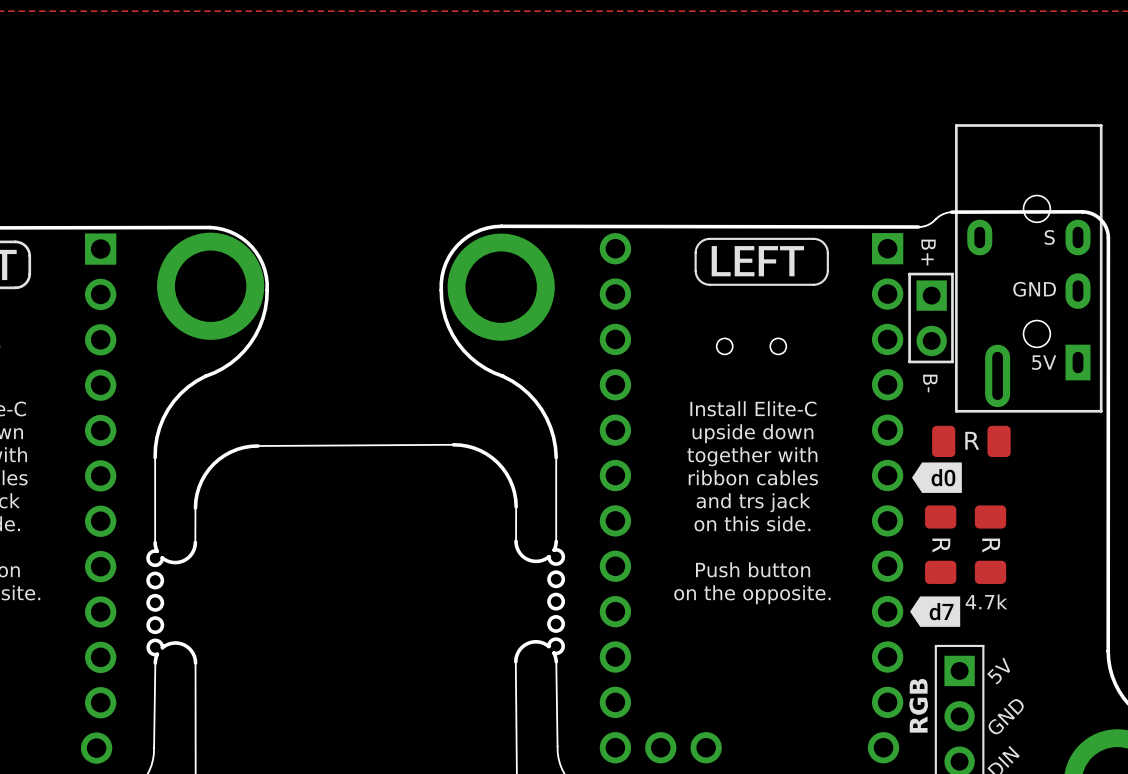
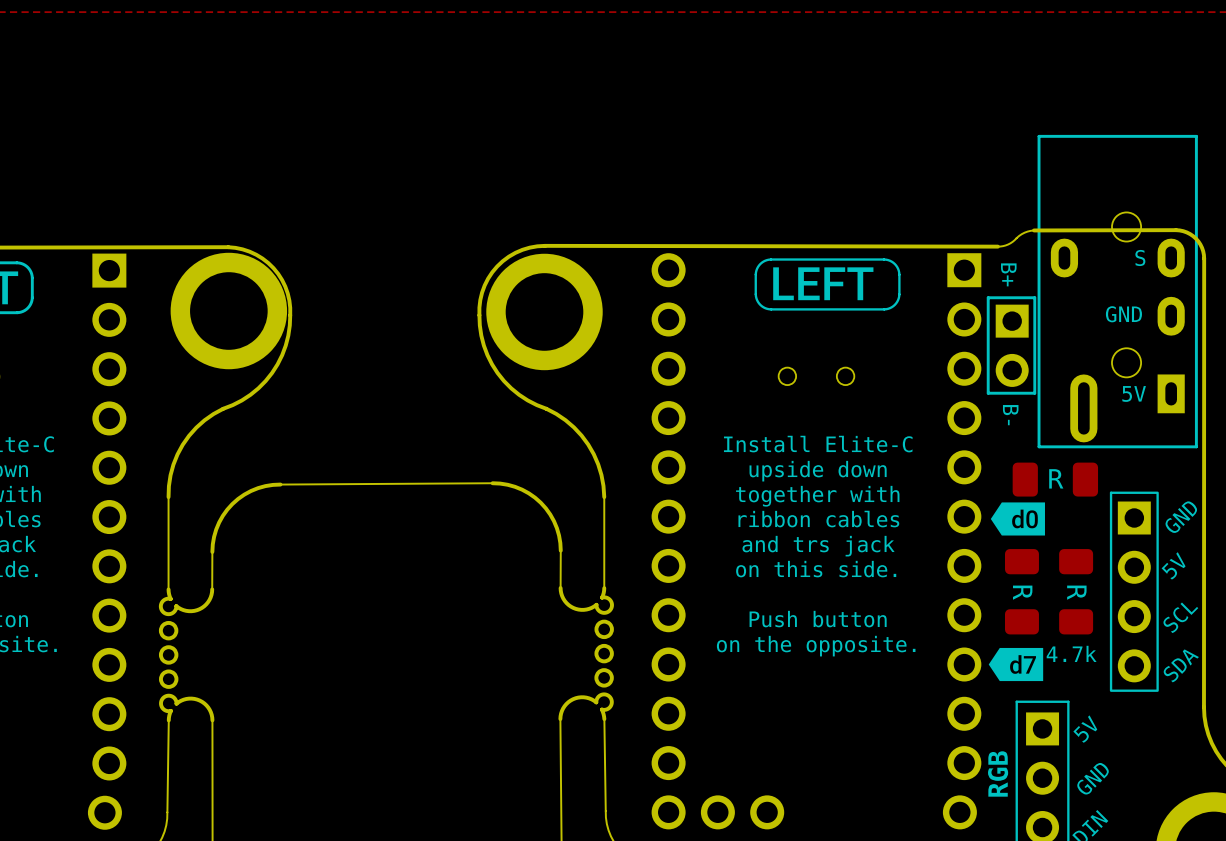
text: none -> GND (1181, 517)
text: none -> 5V (1173, 565)
part: none -> (1134, 591)
text: none -> SCL (1180, 617)
text: none -> SDA (1181, 665)

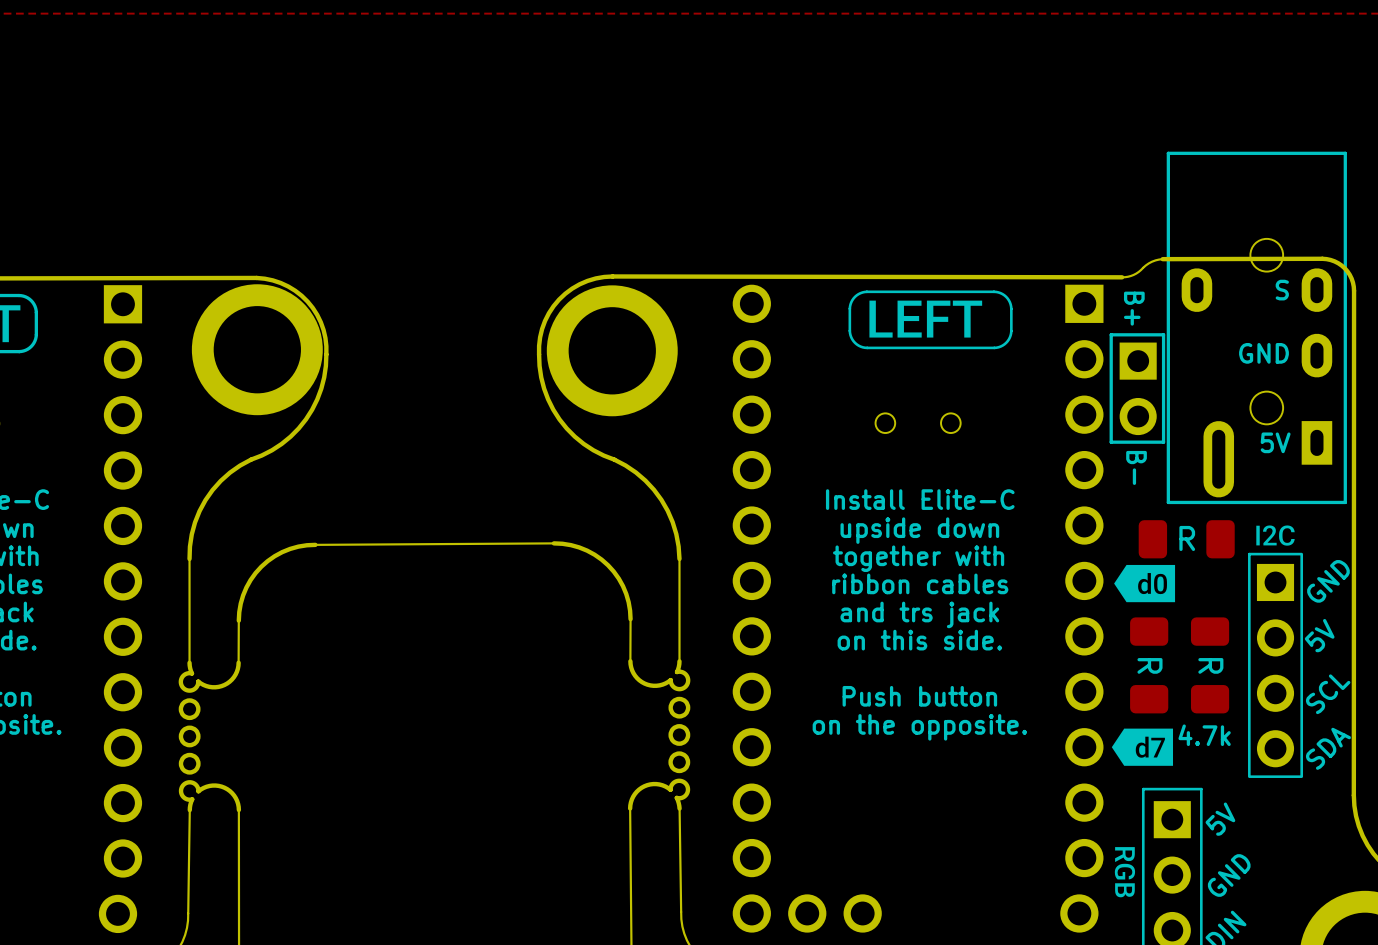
drawing: none -> [1256, 525, 1295, 546]
drawing: none -> [1114, 847, 1136, 898]
text: RGB (998, 773) -> none

